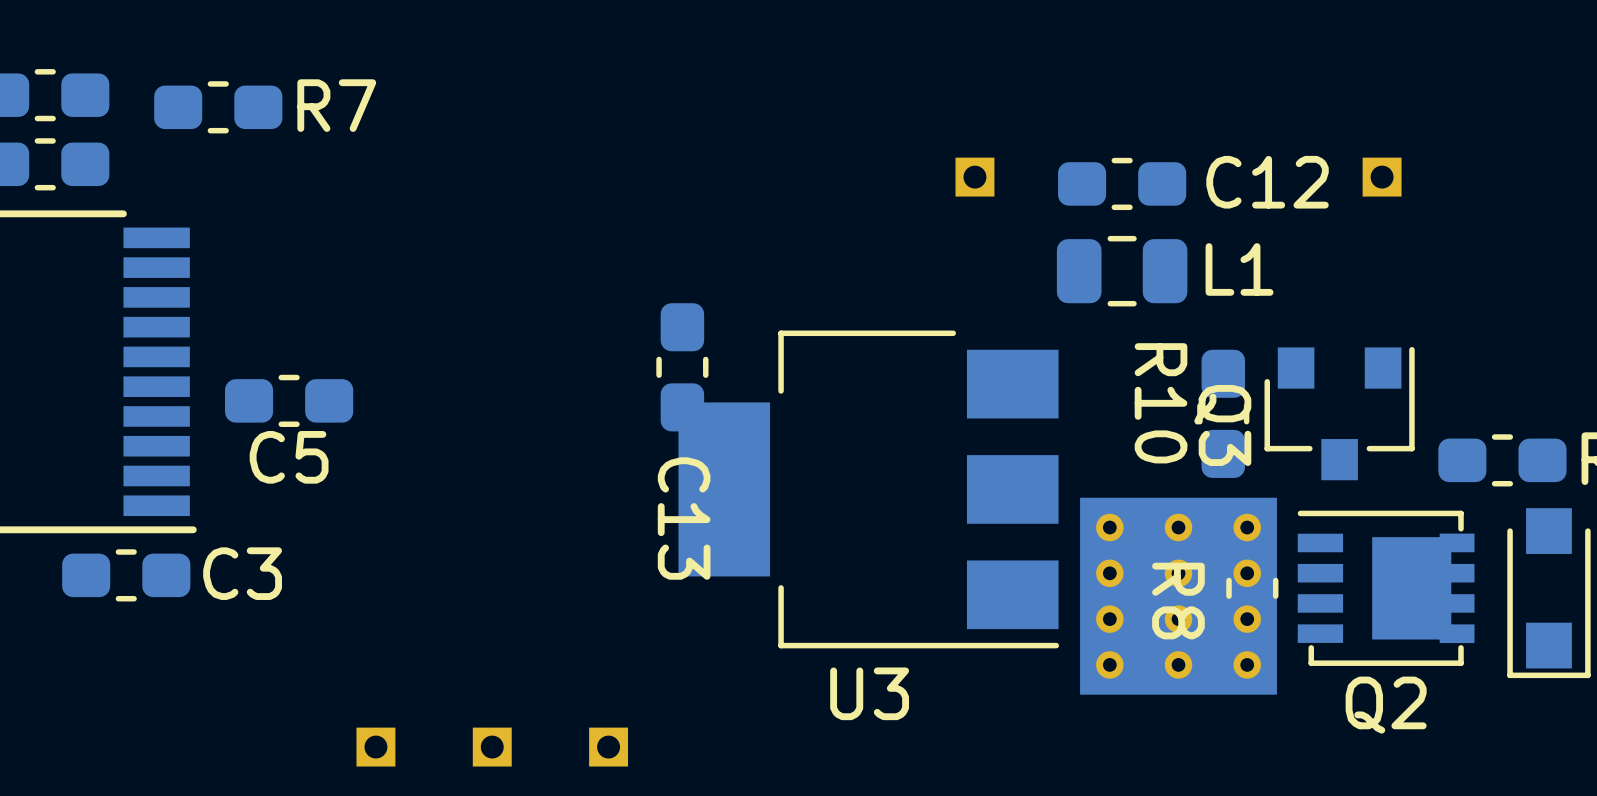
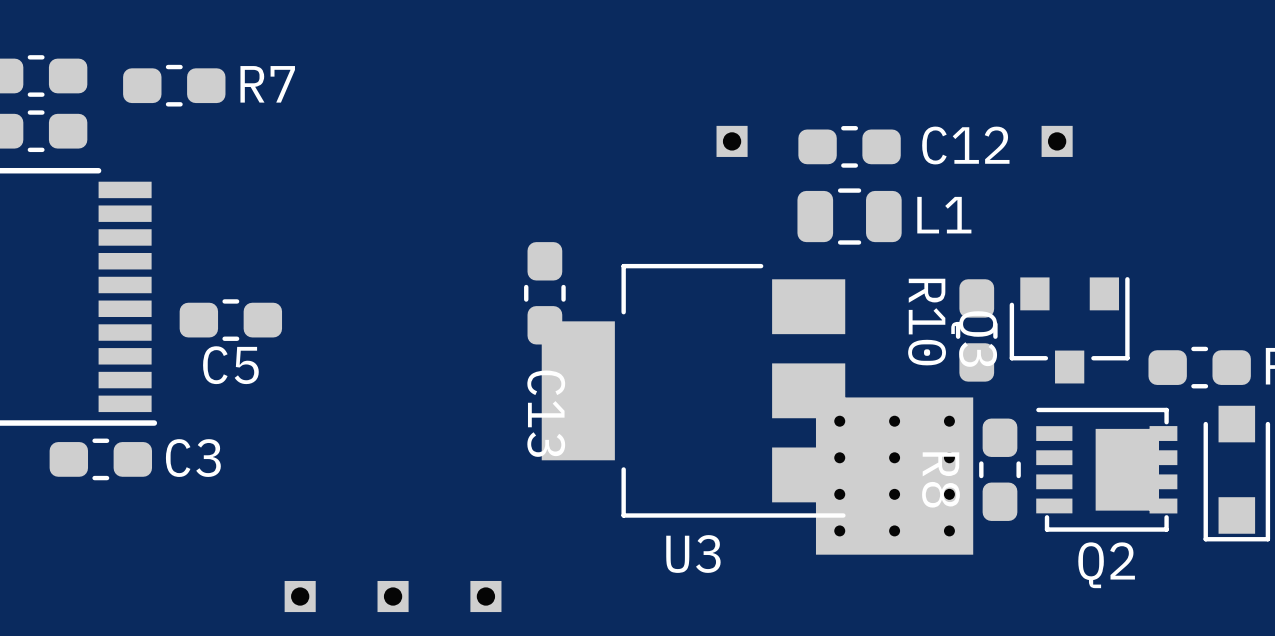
part position: (974, 177) -> (732, 141)
part position: (1382, 177) -> (1057, 141)
C12 position: (1122, 183) -> (849, 146)
L1 position: (1122, 271) -> (849, 216)
part position: (1178, 596) -> (894, 476)

